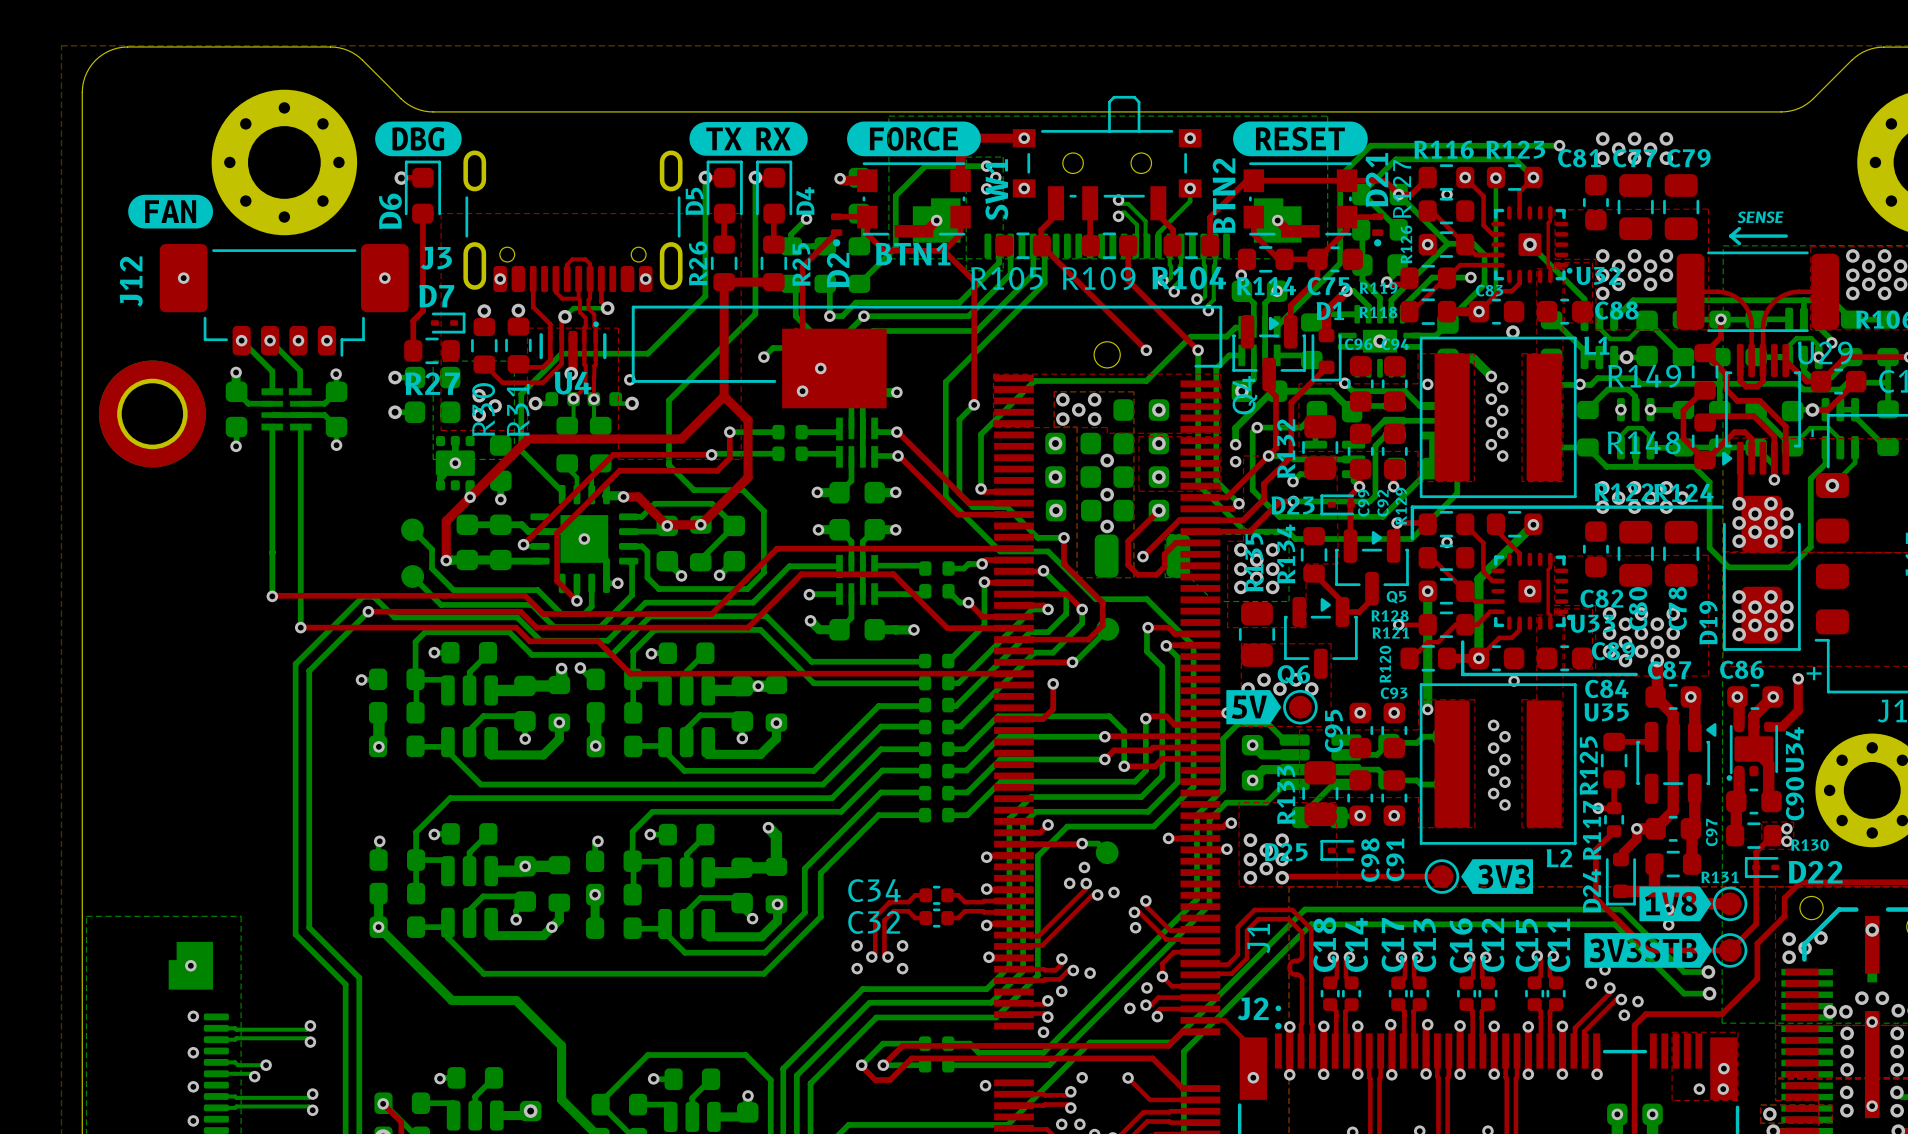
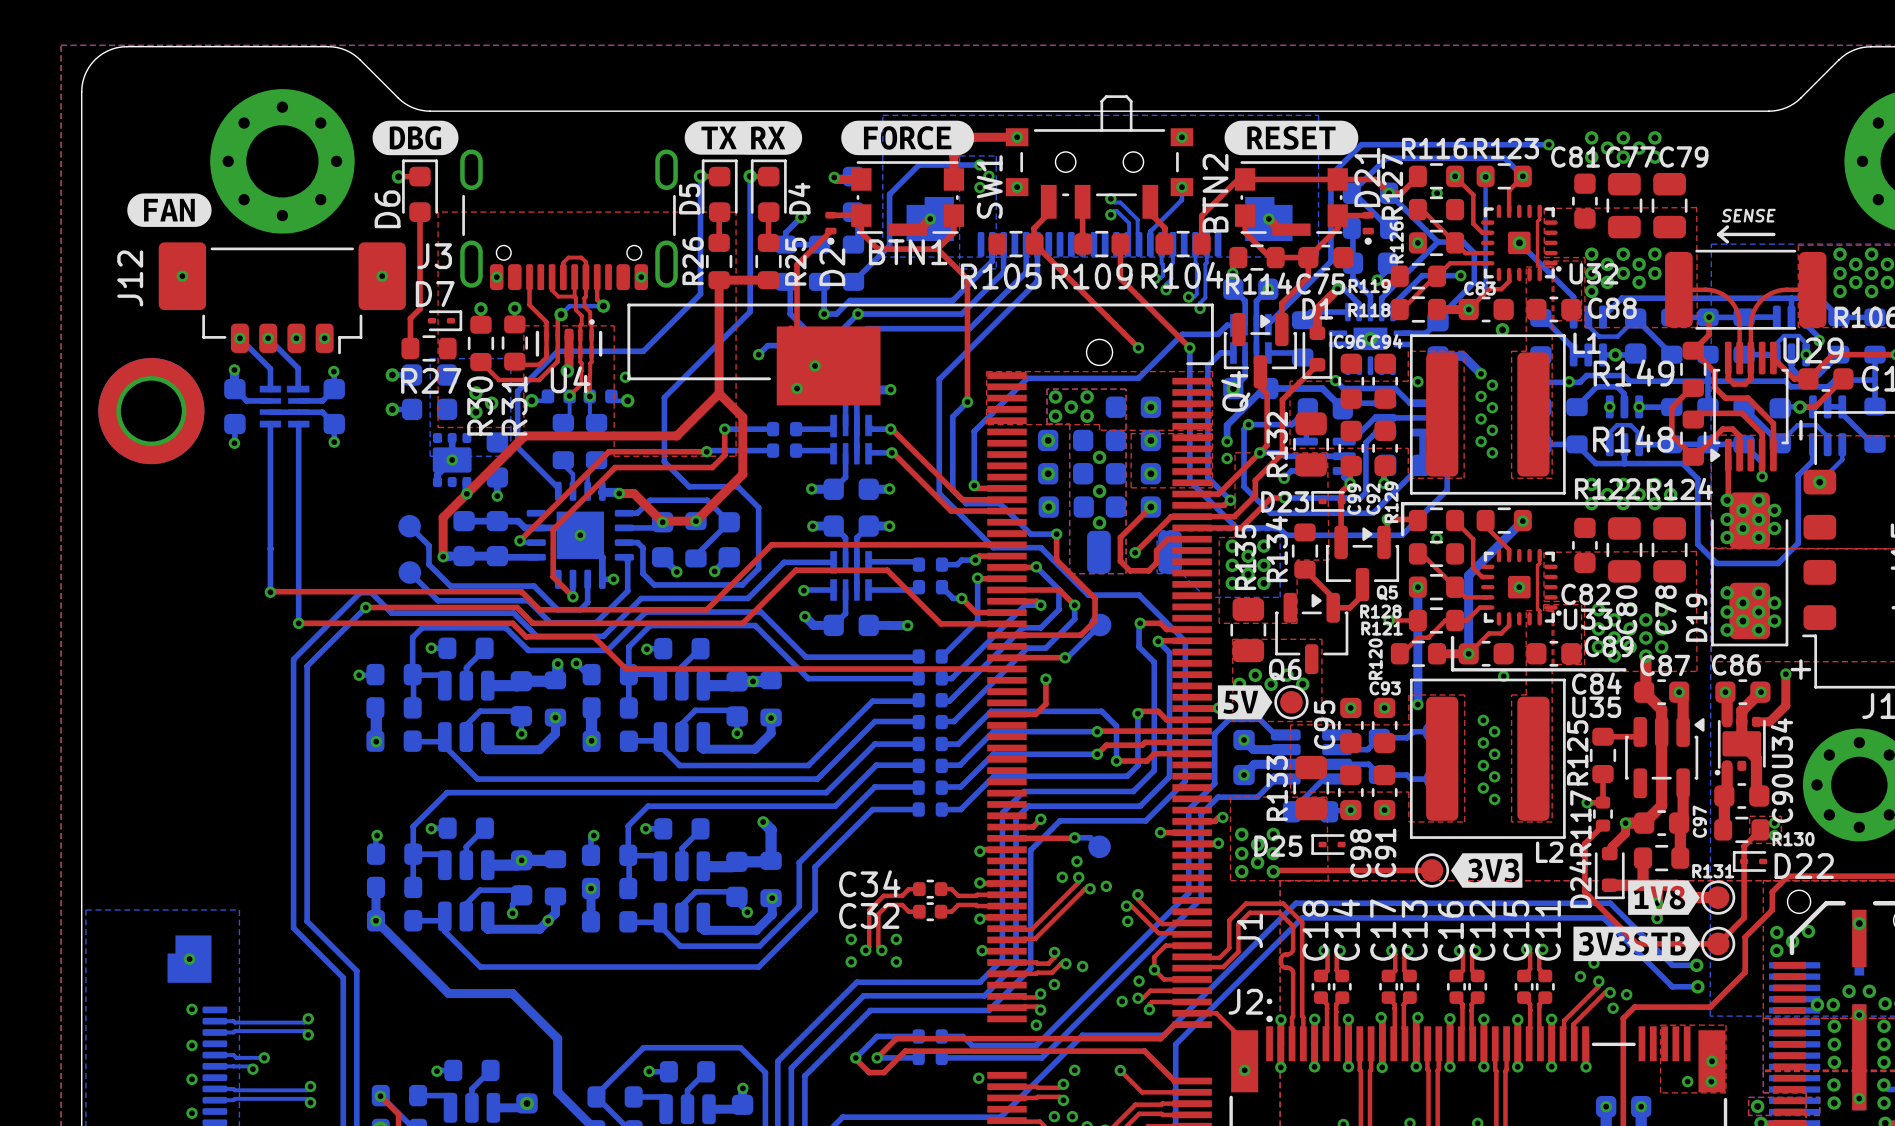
L1 footprint: [1419, 336, 1577, 499] -> [1409, 334, 1566, 495]
L2 footprint: [1419, 683, 1577, 845] -> [1409, 678, 1566, 839]

